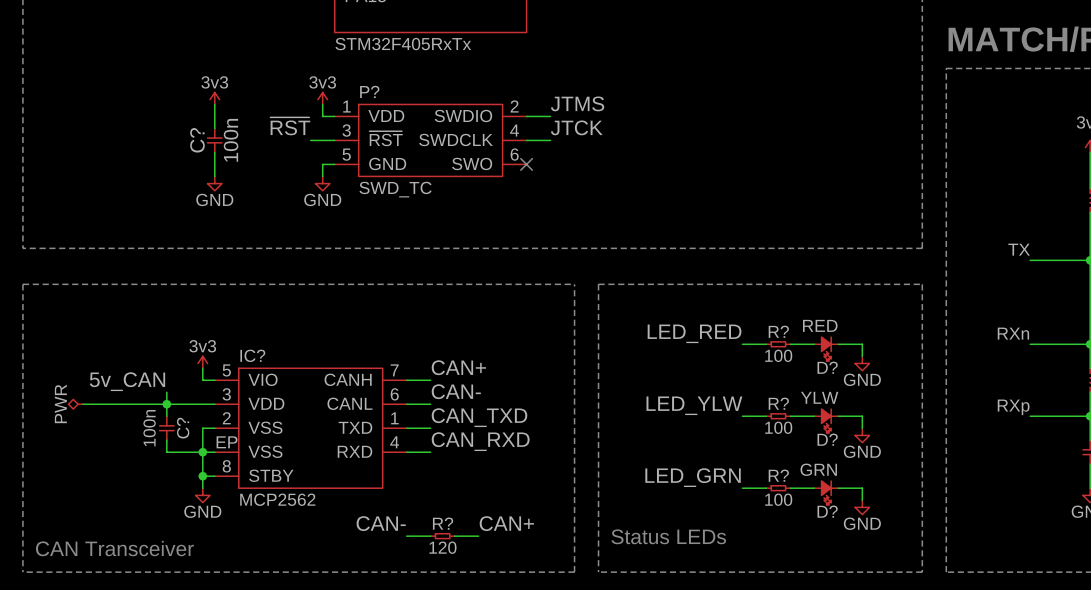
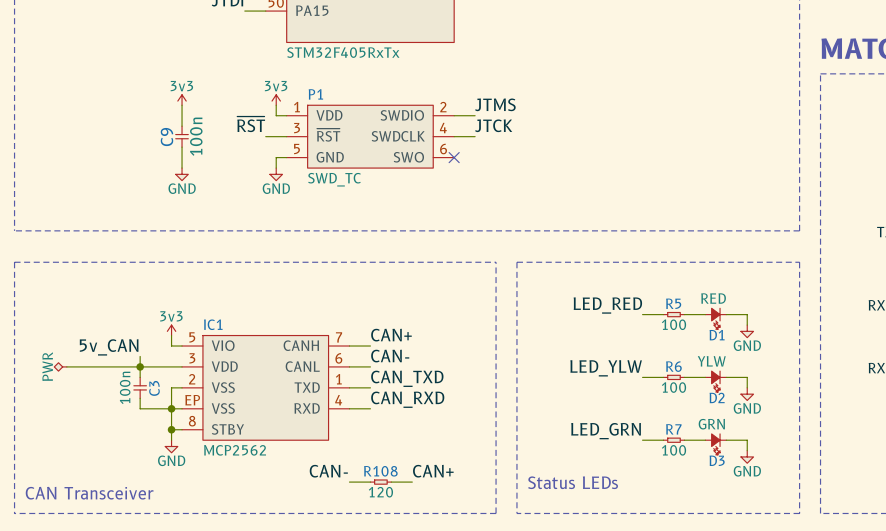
P? name: P? (369, 91) -> P1 (315, 94)
C? name: C? (197, 140) -> C9 (166, 137)
R? name: R? (778, 331) -> R5 (673, 303)
IC? name: IC? (252, 355) -> IC1 (213, 324)
D? name: D? (827, 367) -> D1 (717, 335)
R? name: R? (778, 403) -> R6 (673, 366)
C? name: C? (183, 428) -> C3 (154, 388)
D? name: D? (827, 439) -> D2 (717, 397)
R? name: R? (778, 475) -> R7 (673, 429)
D? name: D? (827, 511) -> D3 (717, 460)
R? name: R? (443, 523) -> R108 (380, 471)

